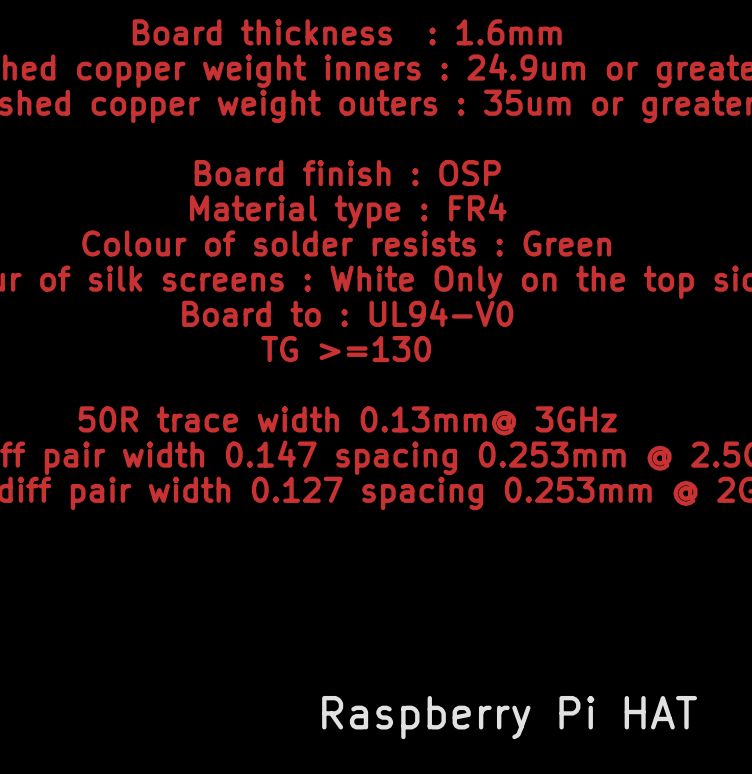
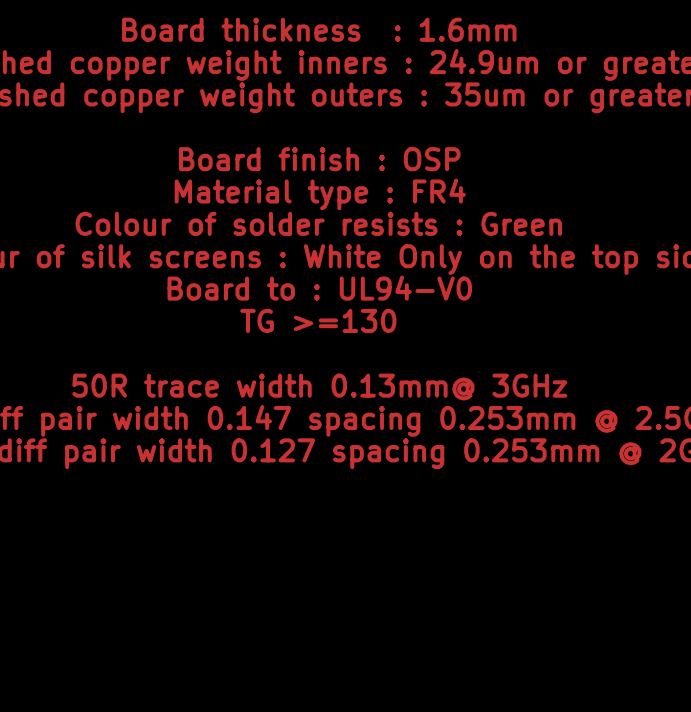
text: Raspberry Pi HAT (509, 717) -> none

